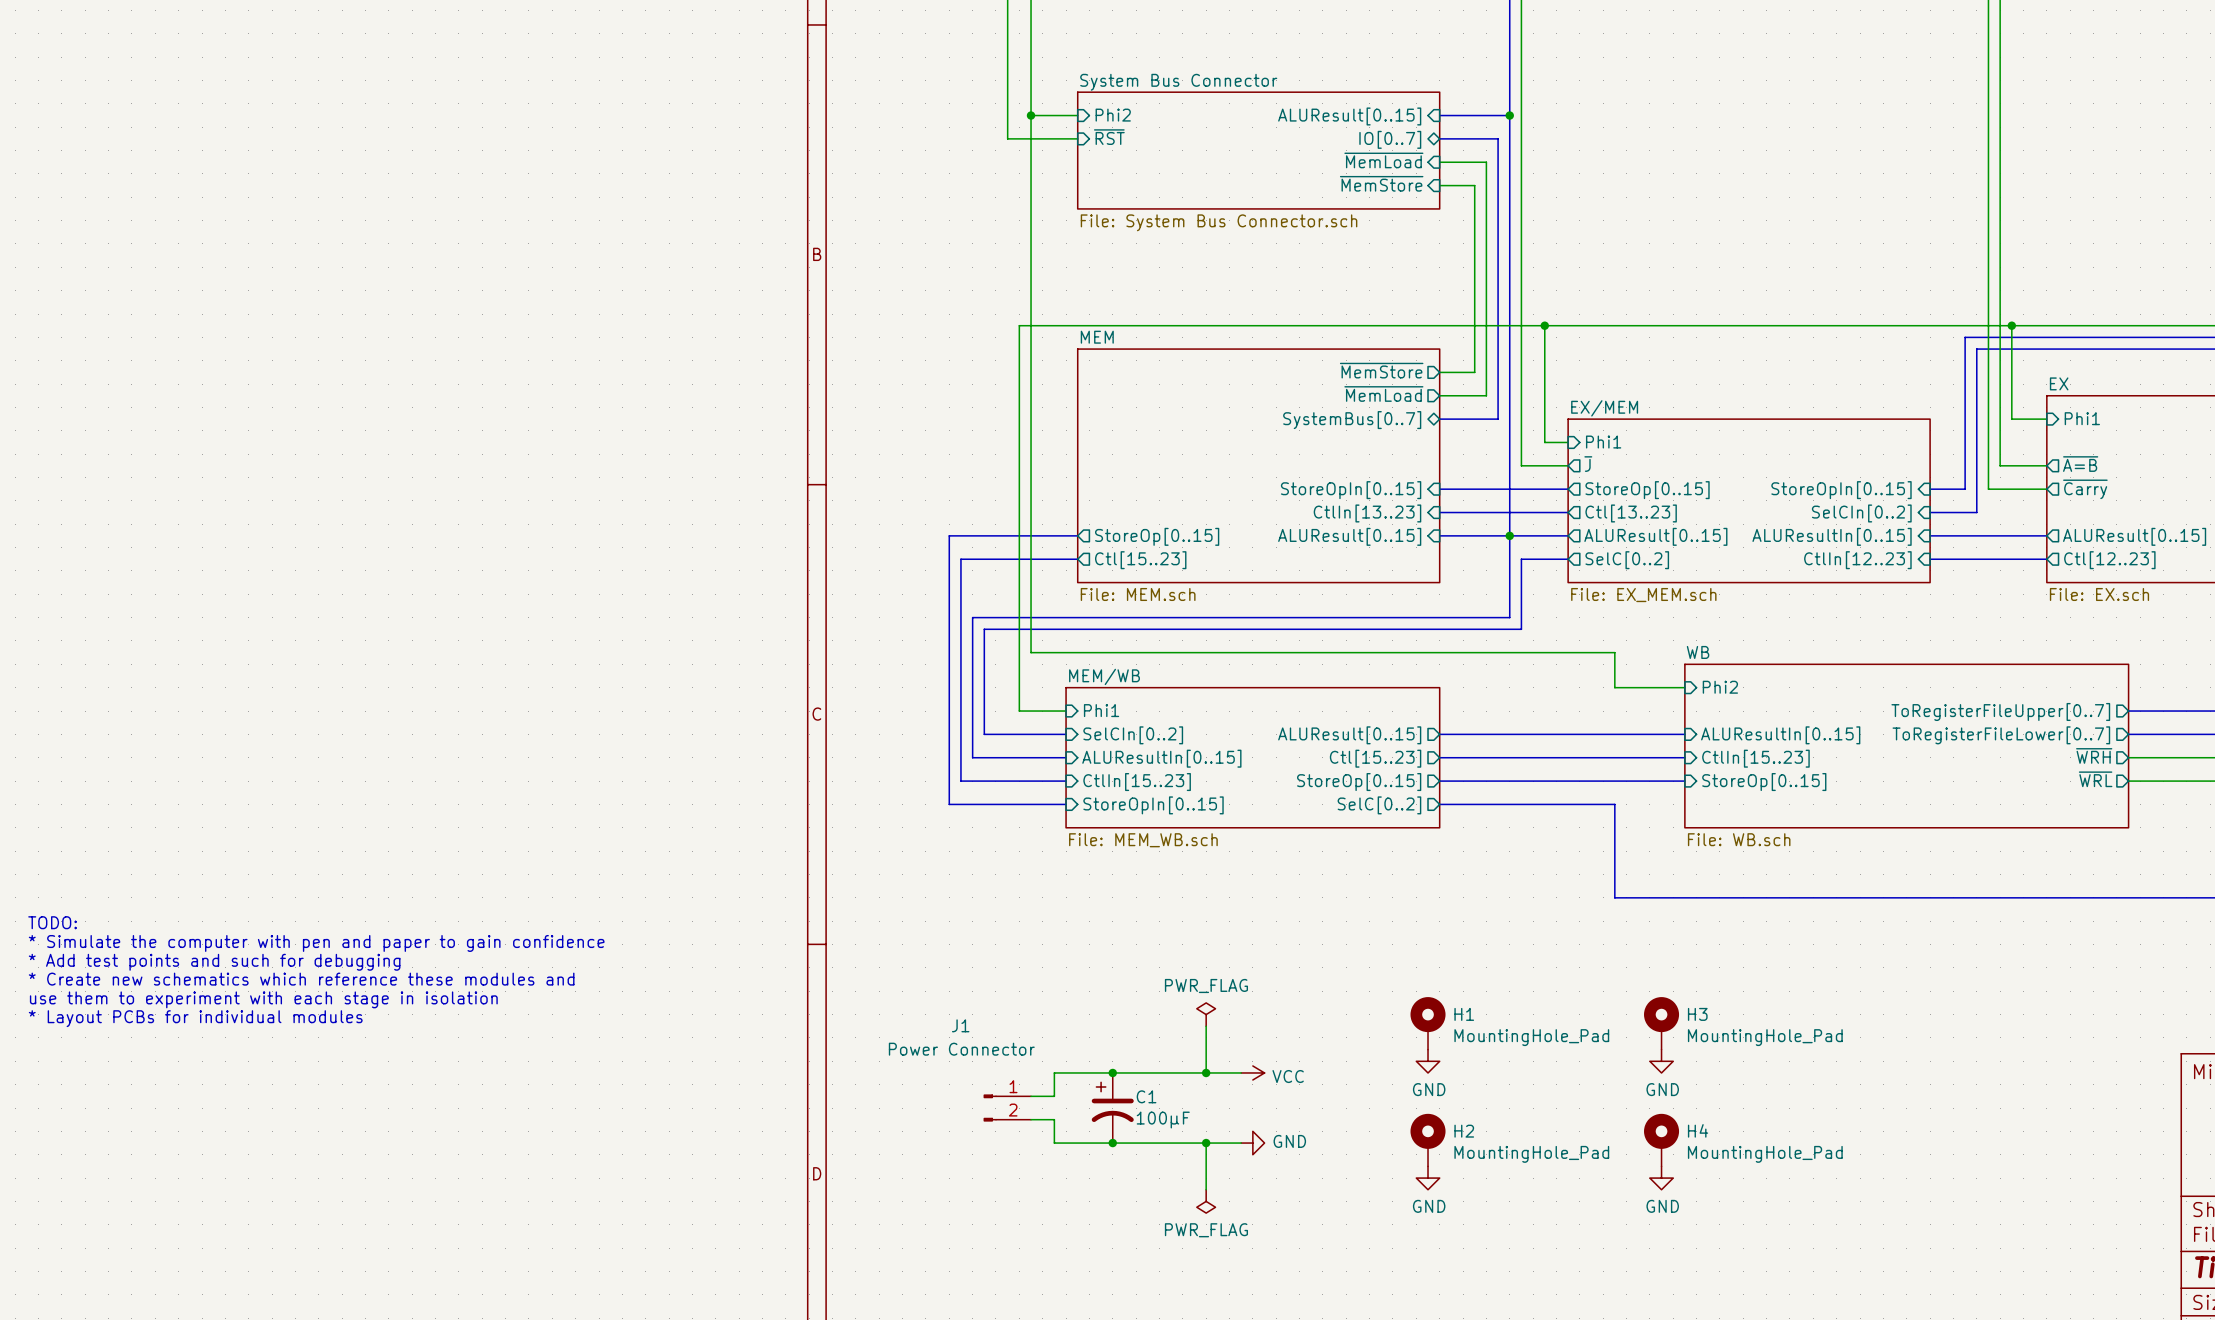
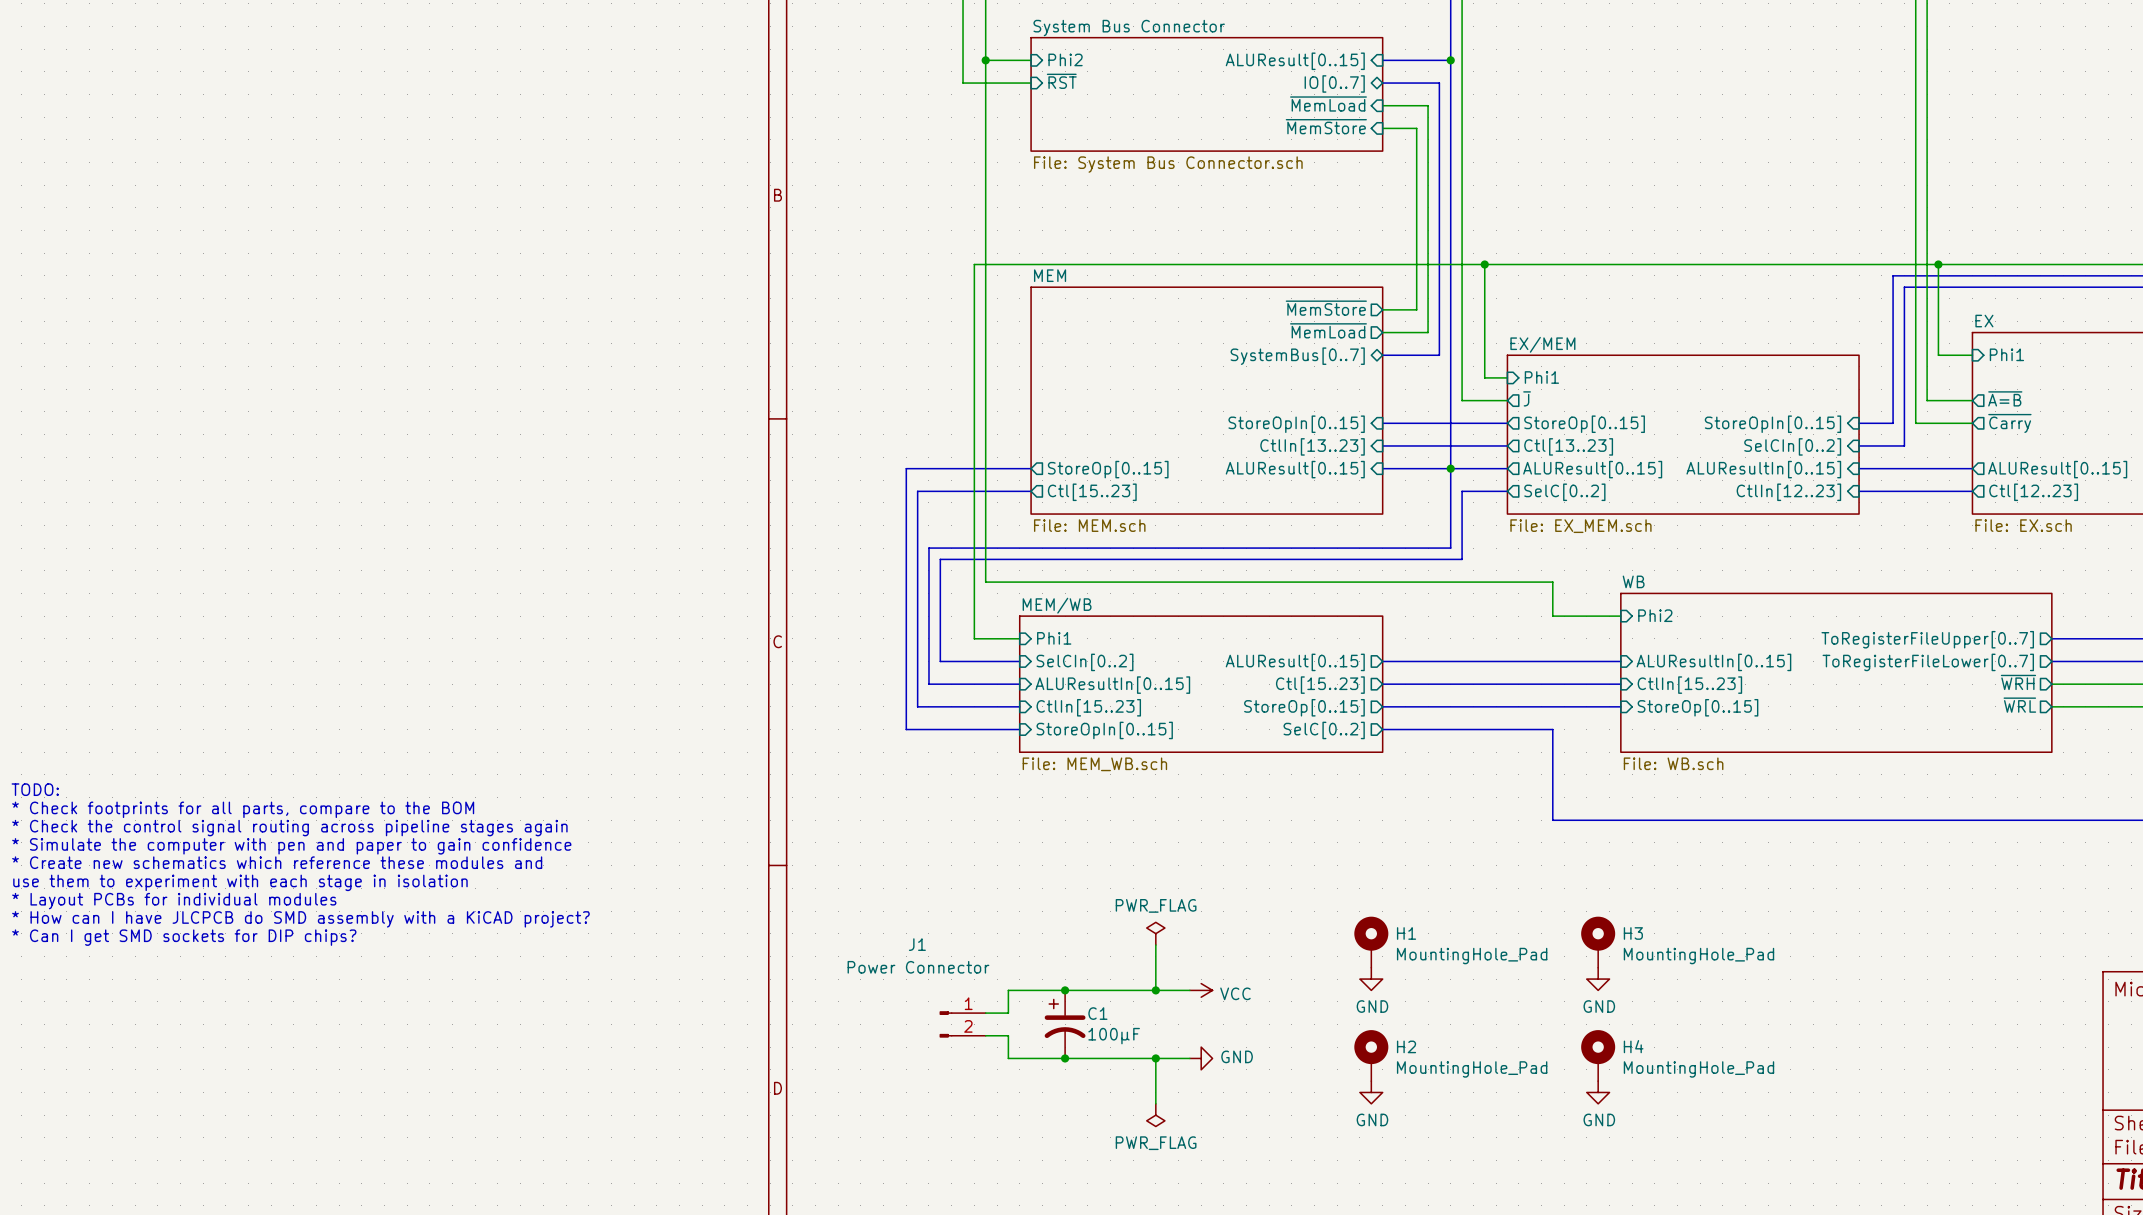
text: none -> TODO: (35, 789)
text: none -> * Check footprints for all parts, compare to the BOM (243, 809)
text: none -> * Check the control signal routing across pipeline stages again (289, 828)
text: TODO: (52, 922) -> * Simulate the computer with pen and paper to gain confidence (291, 846)
text: * Simulate the computer with pen and paper to gain confidence (316, 943) -> * Create new schematics which reference these modules and (277, 862)
text: * Add test points and such for debugging (214, 962) -> use them to experiment with each stage in isolation (240, 882)
text: * Create new schematics which reference these modules and (301, 979) -> * Layout PCBs for individual modules (174, 901)
text: use them to experiment with each stage in isolation (263, 999) -> * How can I have JLCPCB do SMD assembly with a KiCAD project? (300, 919)
text: * Layout PCBs for individual modules (195, 1018) -> * Can I get SMD sockets for DIP chips? (184, 937)

